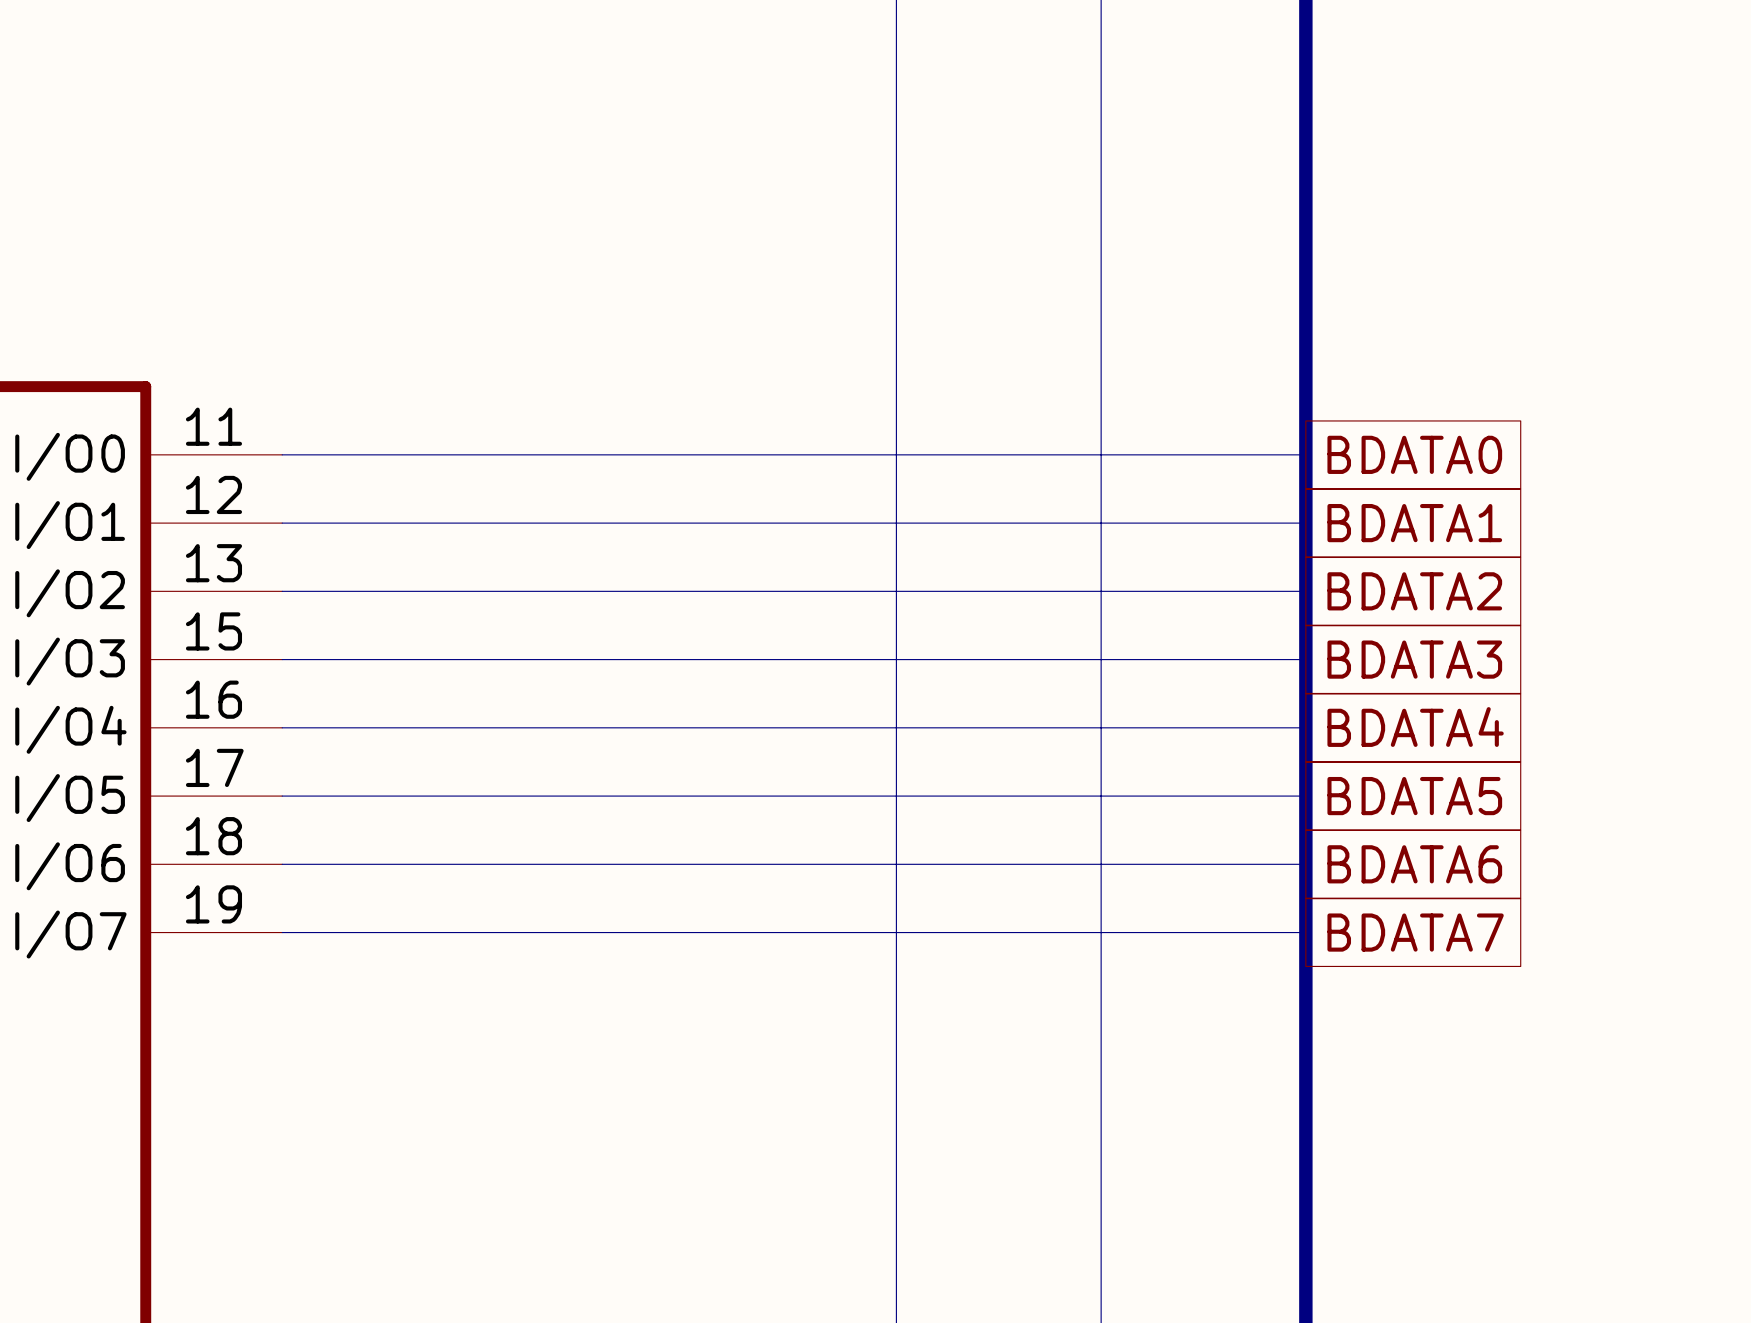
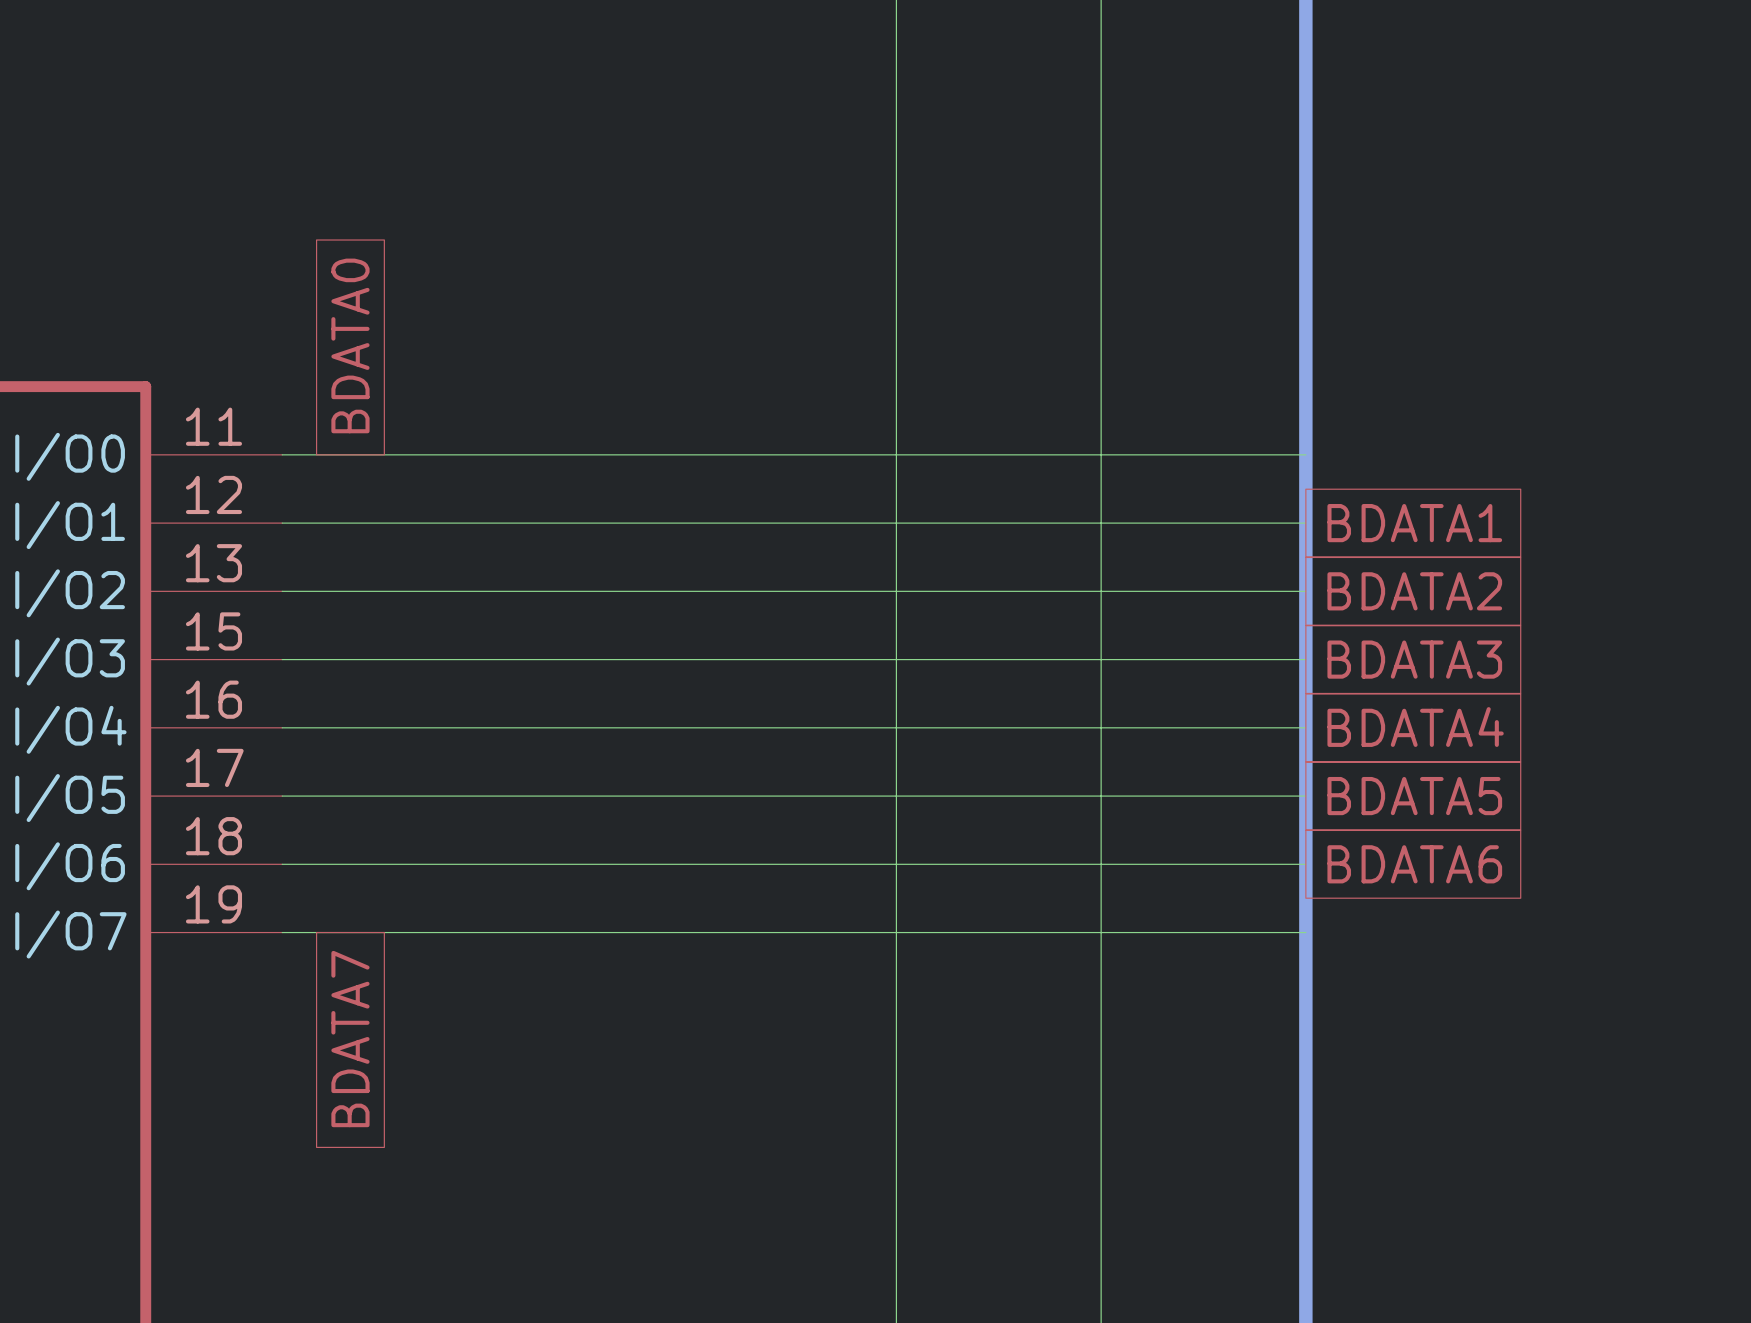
global label: none -> BDATA0 (350, 345)
global label: BDATA0 (1414, 454) -> none
global label: BDATA7 (1415, 932) -> none
global label: none -> BDATA7 (350, 1039)

